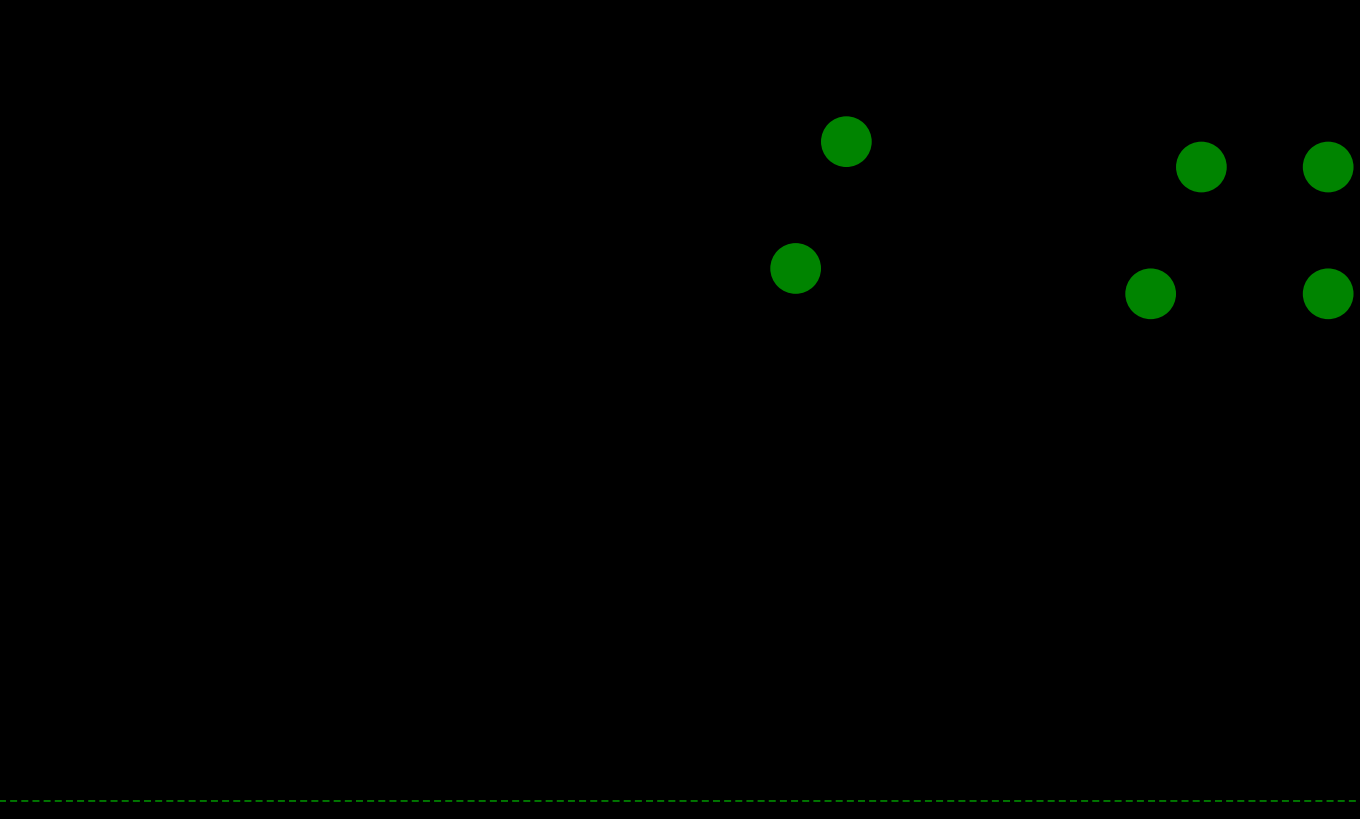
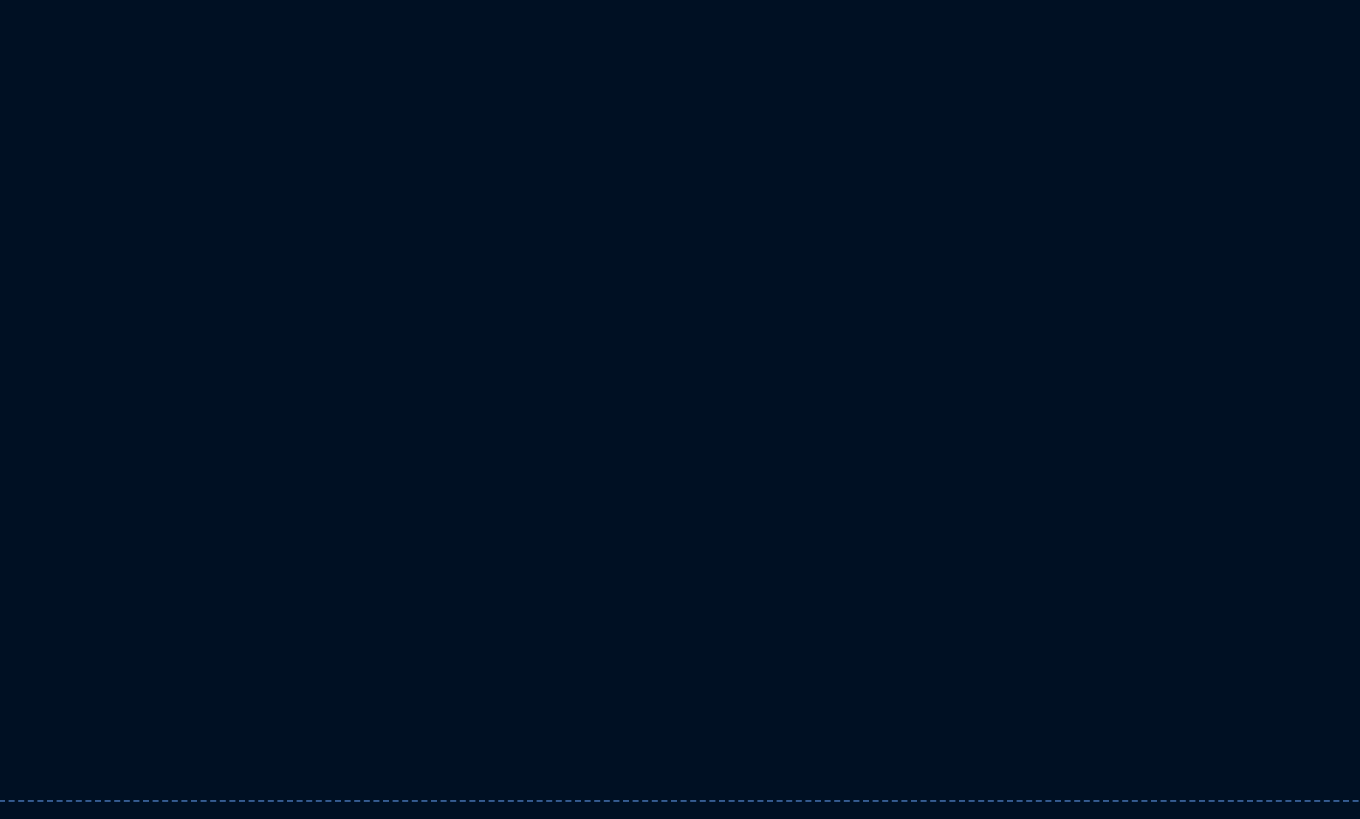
part: (846, 141) -> none
part: (1201, 167) -> none
part: (1328, 167) -> none
part: (795, 268) -> none
part: (1150, 293) -> none
part: (1328, 293) -> none

